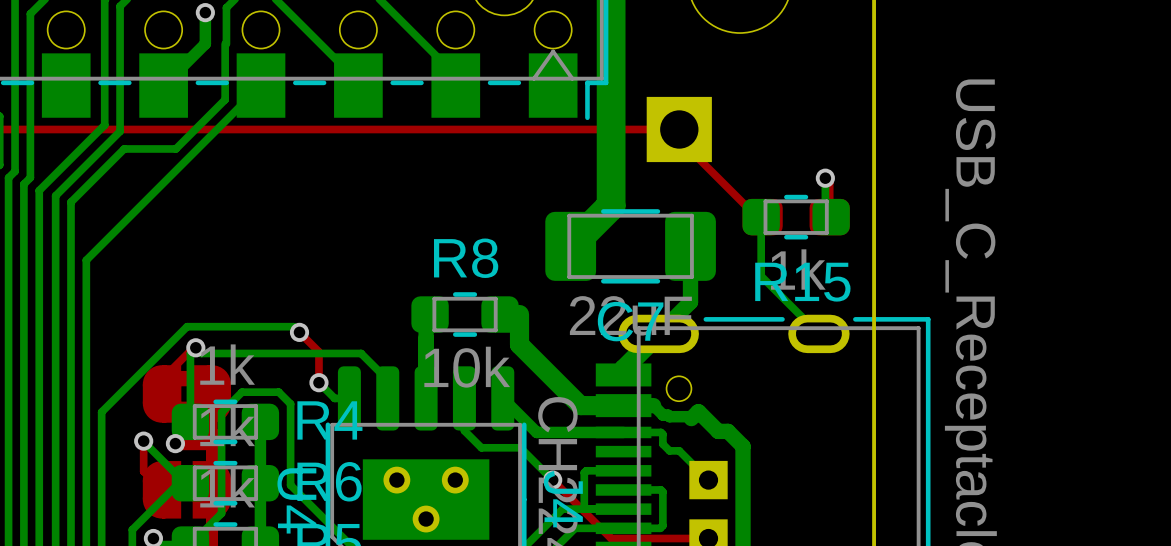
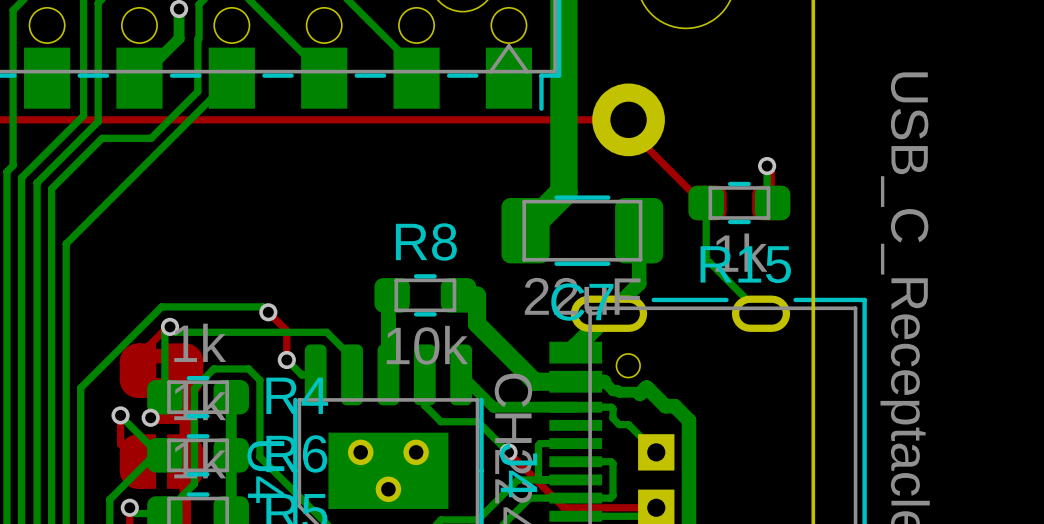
part footprint: [646, 96, 712, 163] -> [592, 83, 665, 157]

